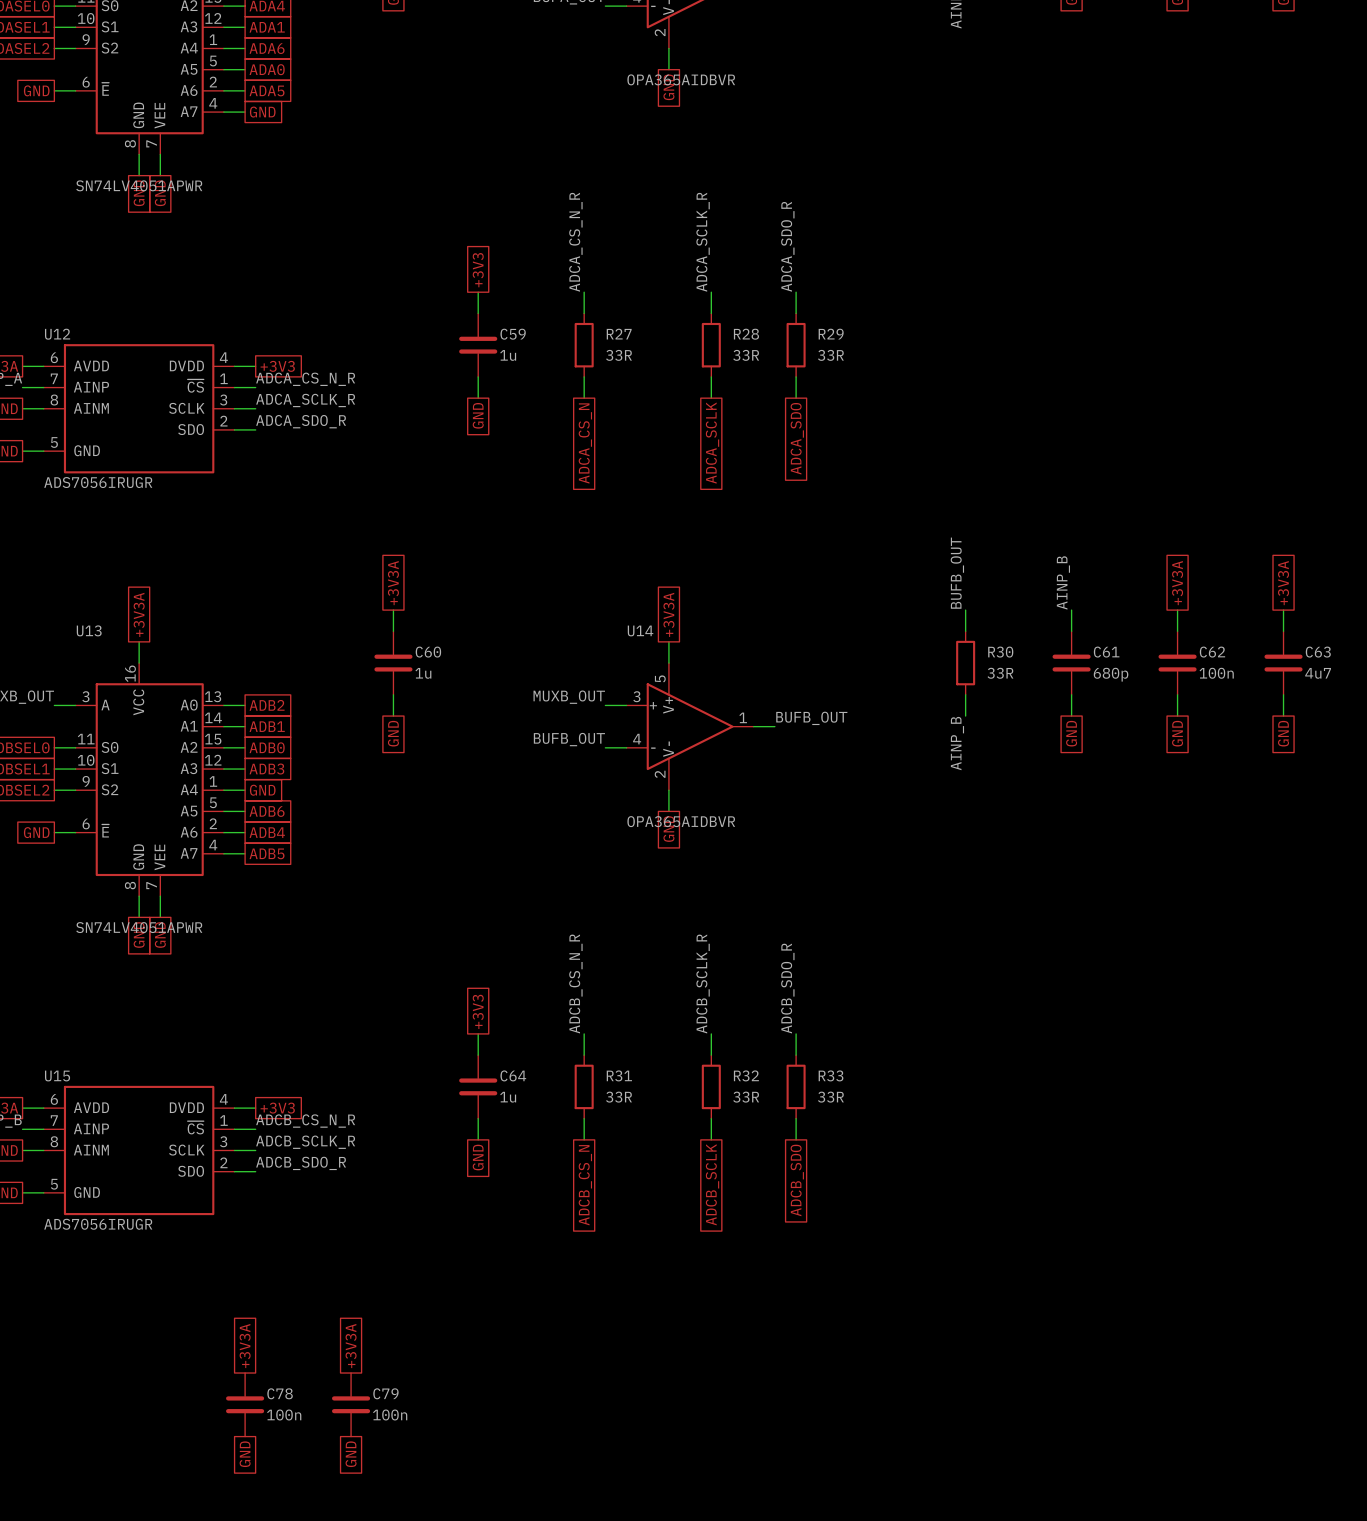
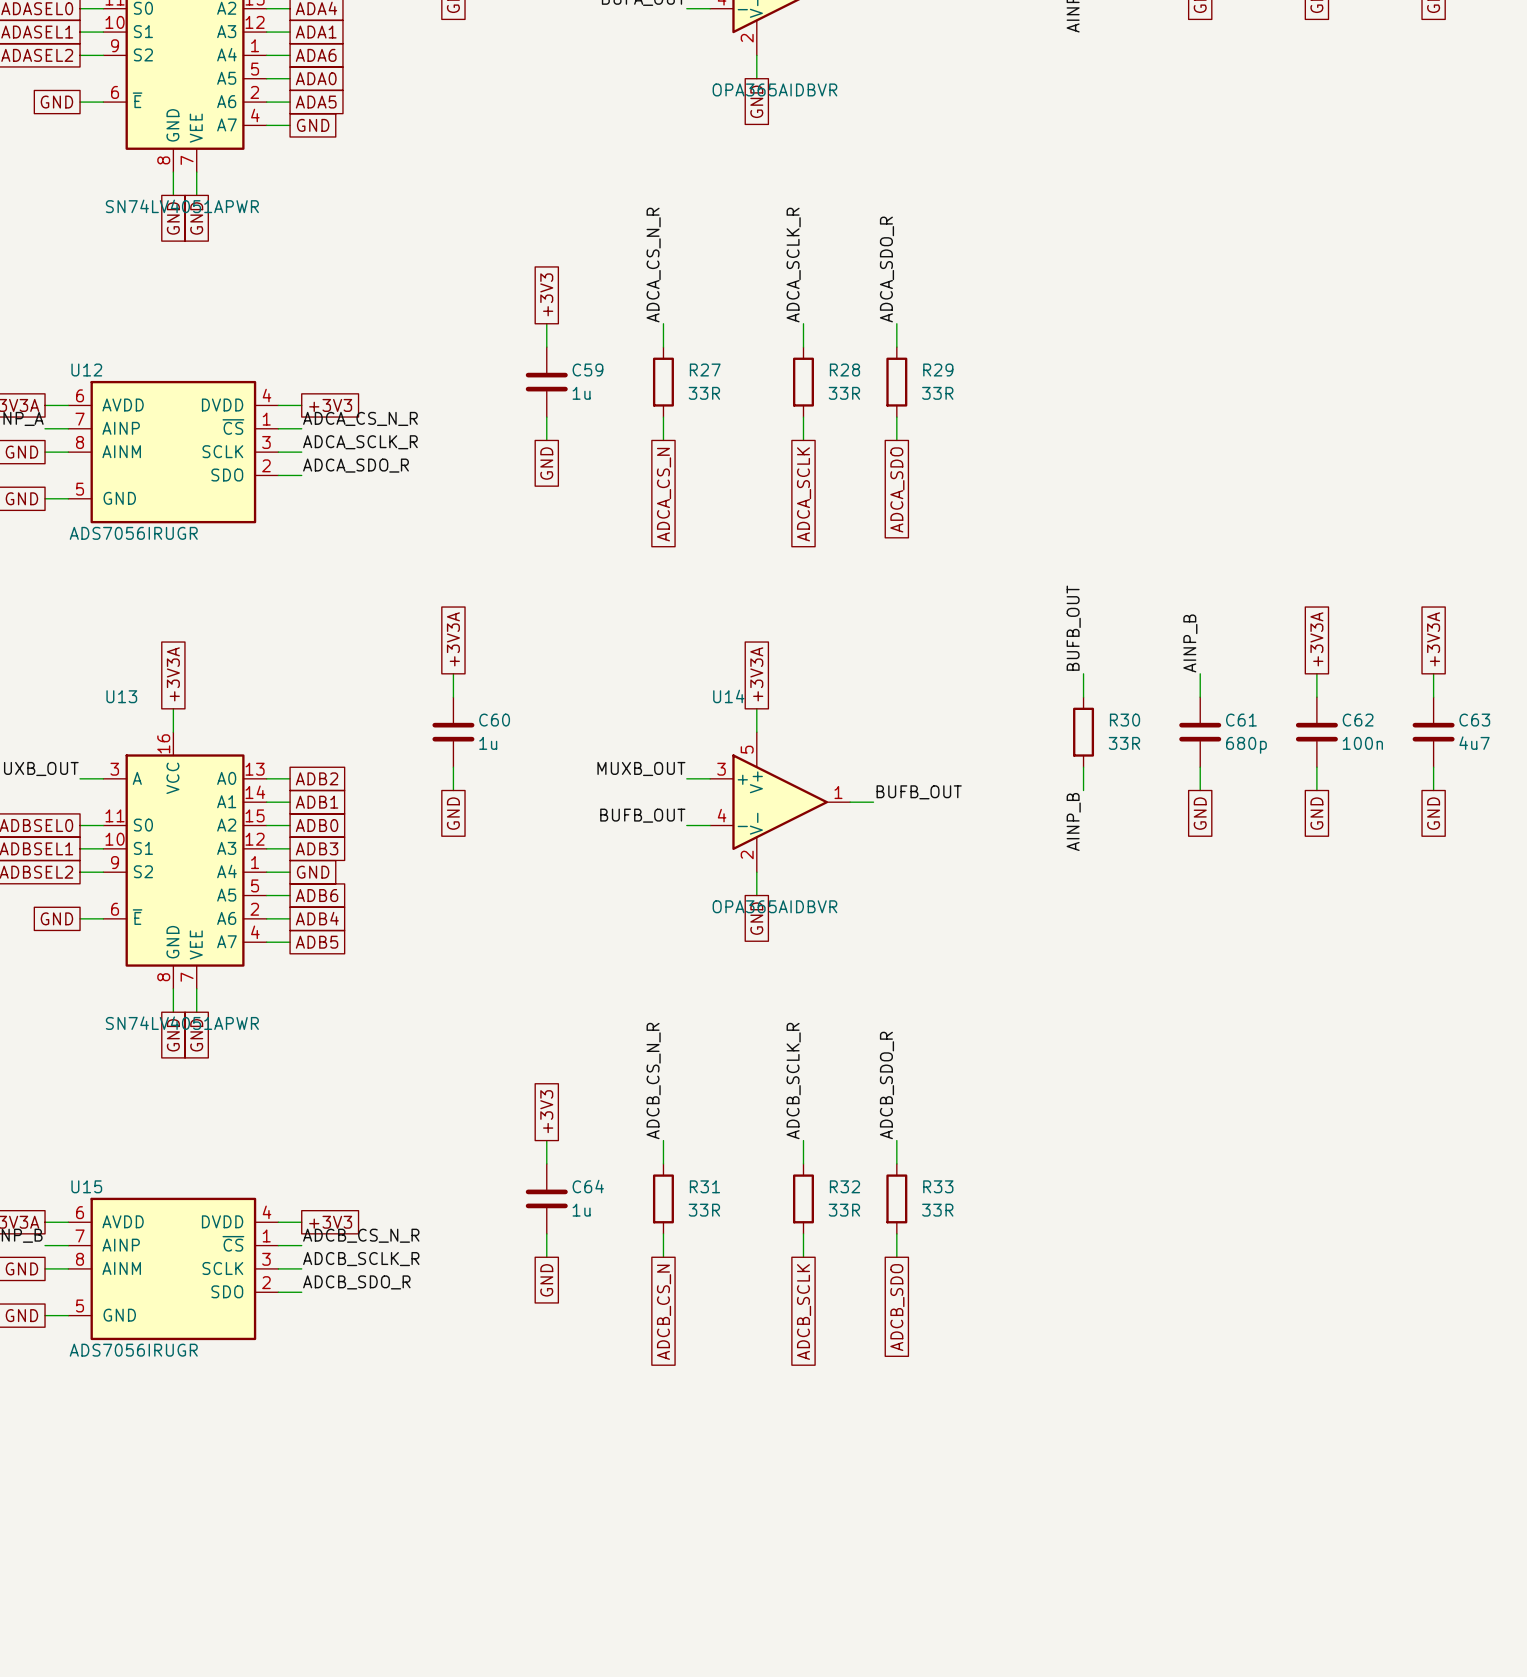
global label: +3V3A (245, 1346) -> none
global label: +3V3A (351, 1346) -> none
C78: 100n (245, 1404) -> none
C79: 100n (351, 1404) -> none
global label: GND (245, 1454) -> none
global label: GND (351, 1454) -> none

